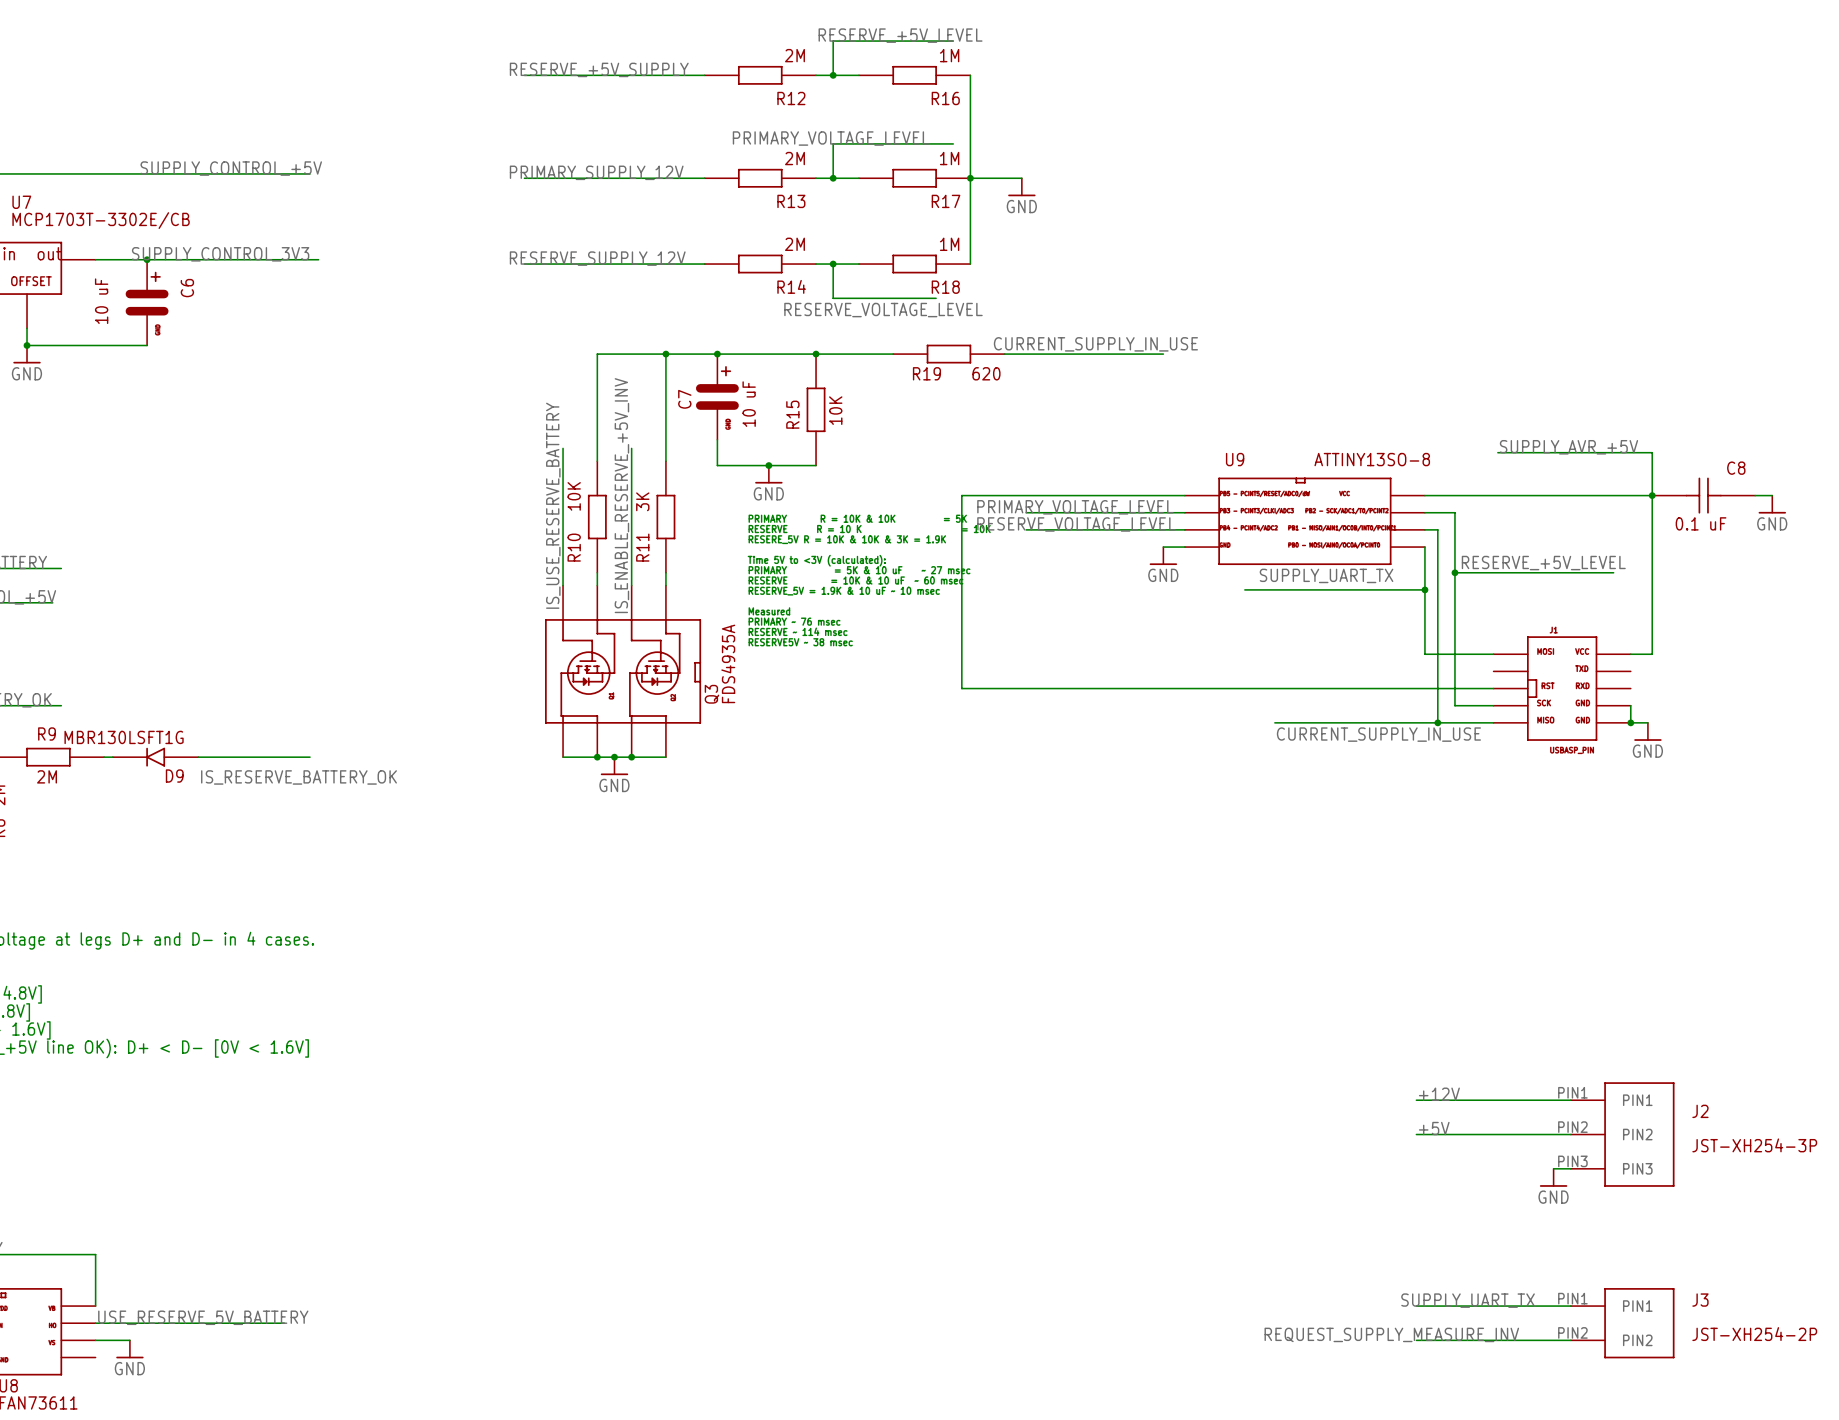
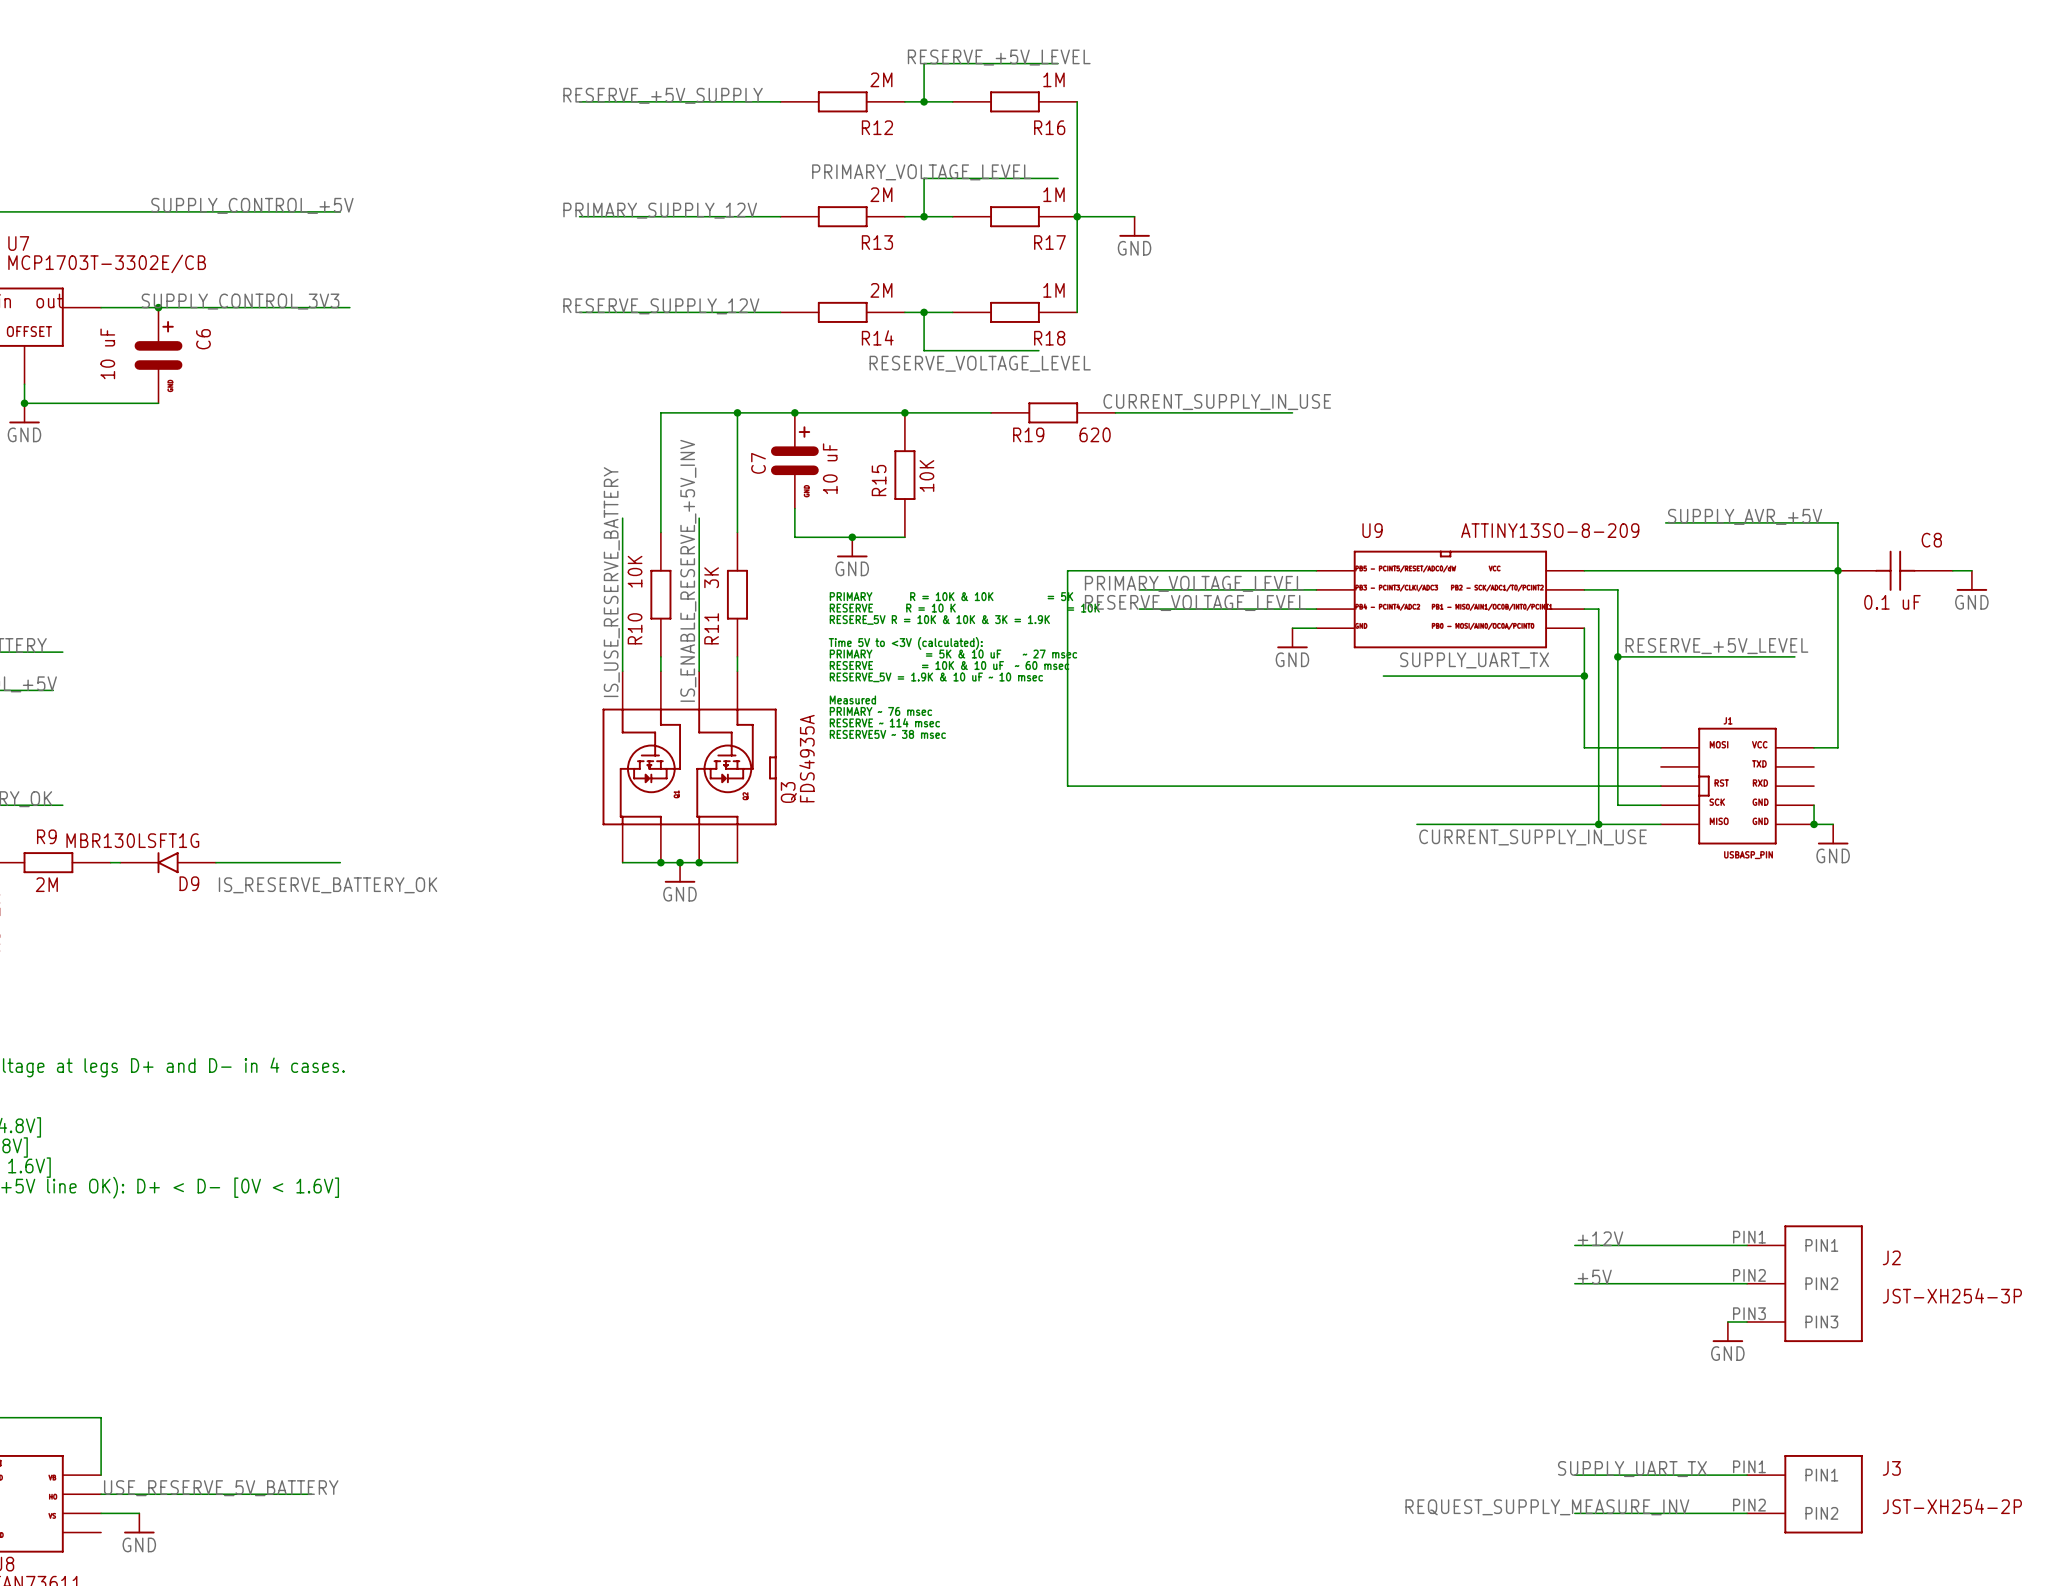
U9 value: ATTINY13SO-8 (1372, 459) -> ATTINY13SO-8-209 (1550, 530)

